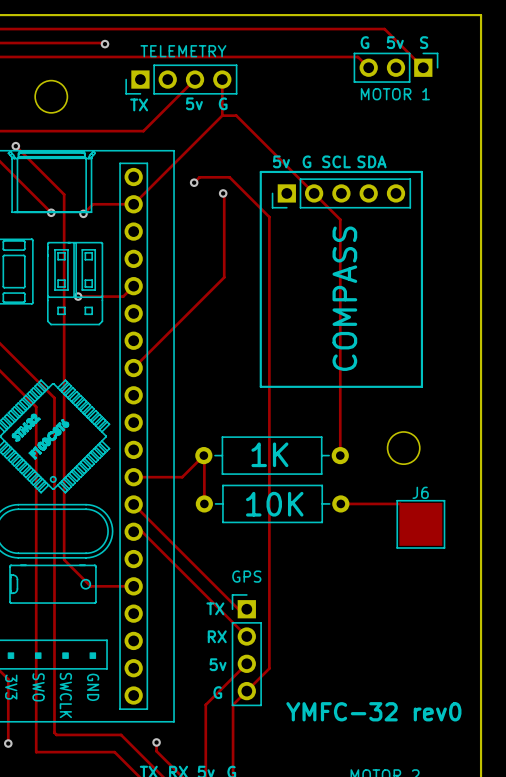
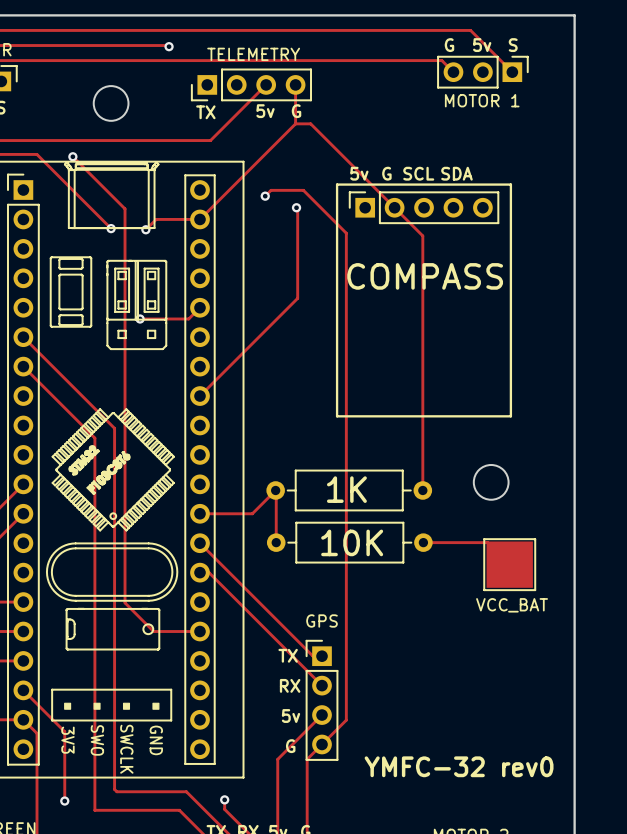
part footprint: [271, 178, 411, 209] -> [349, 191, 500, 224]
part value position: COMPASS (344, 298) -> COMPASS (425, 276)
J6 name: J6 (420, 492) -> none
J6 value: none -> VCC_BAT (512, 605)

